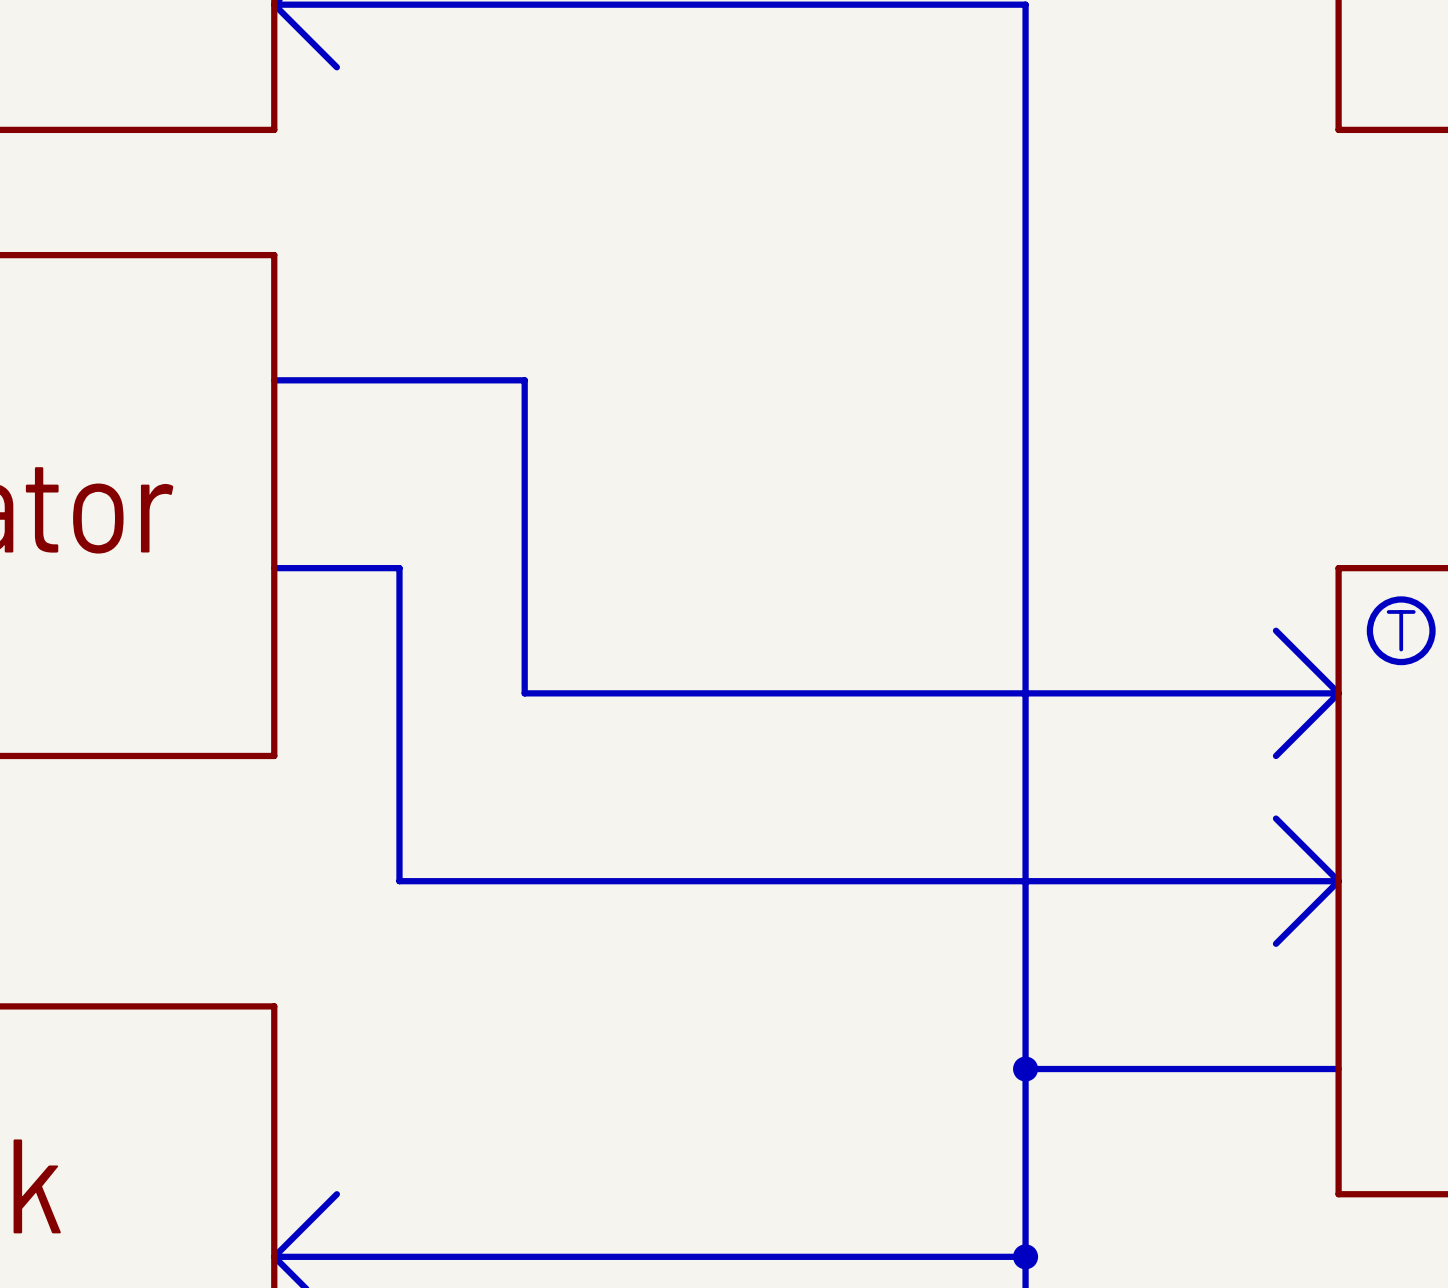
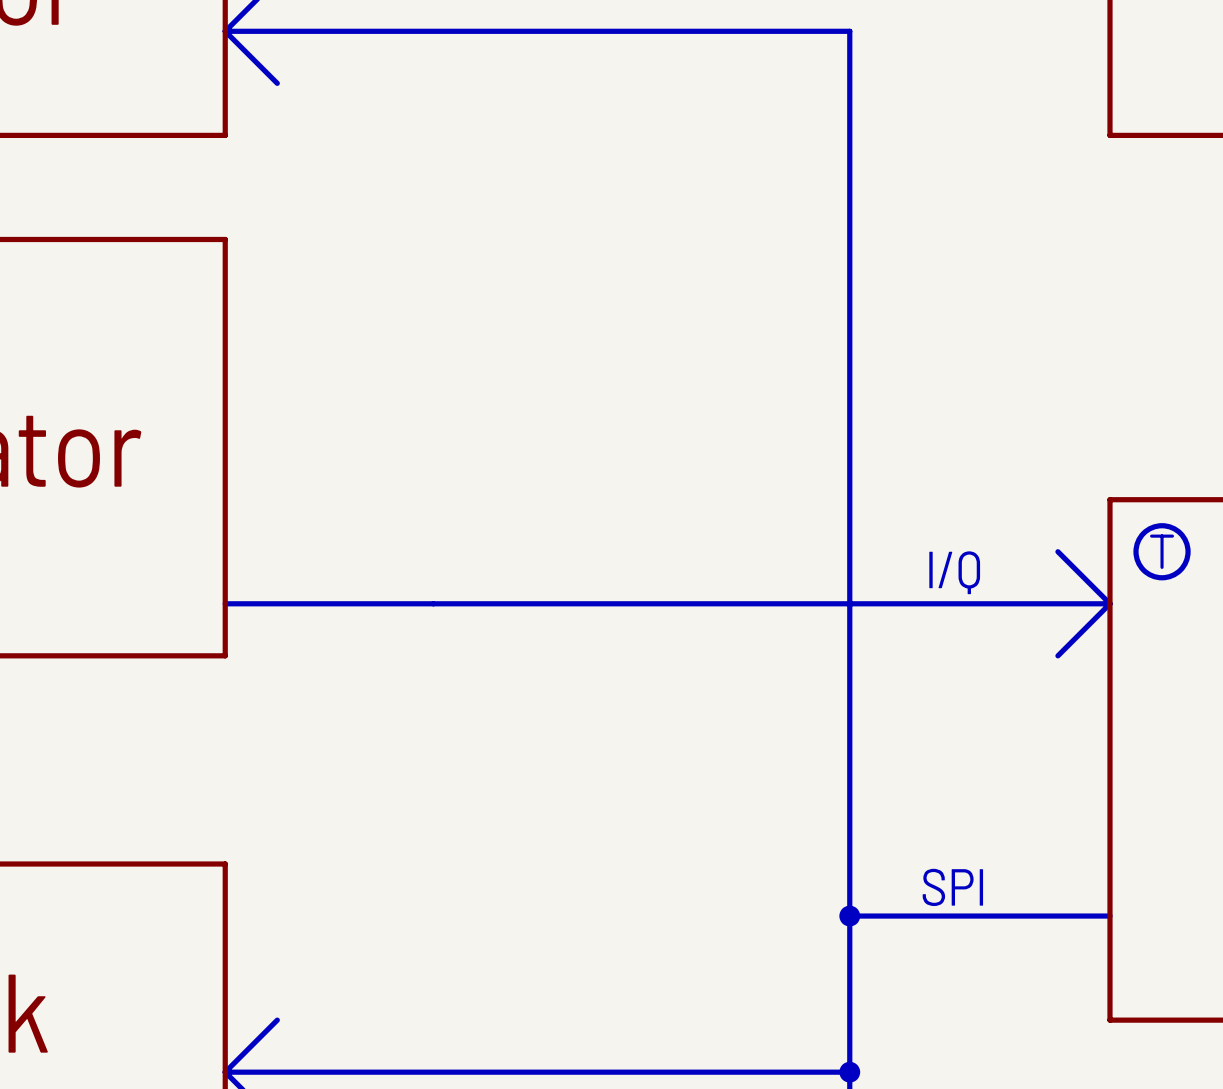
line: (274, 380) (524, 380) (524, 693) -> (225, 603) (433, 603)
line: (274, 568) (399, 568) (399, 881) (1338, 881) -> none
text: none -> I/Q (954, 572)
line: (1275, 818) (1338, 881) -> none
line: (1338, 881) (1275, 943) -> none
text: none -> SPI (952, 887)

